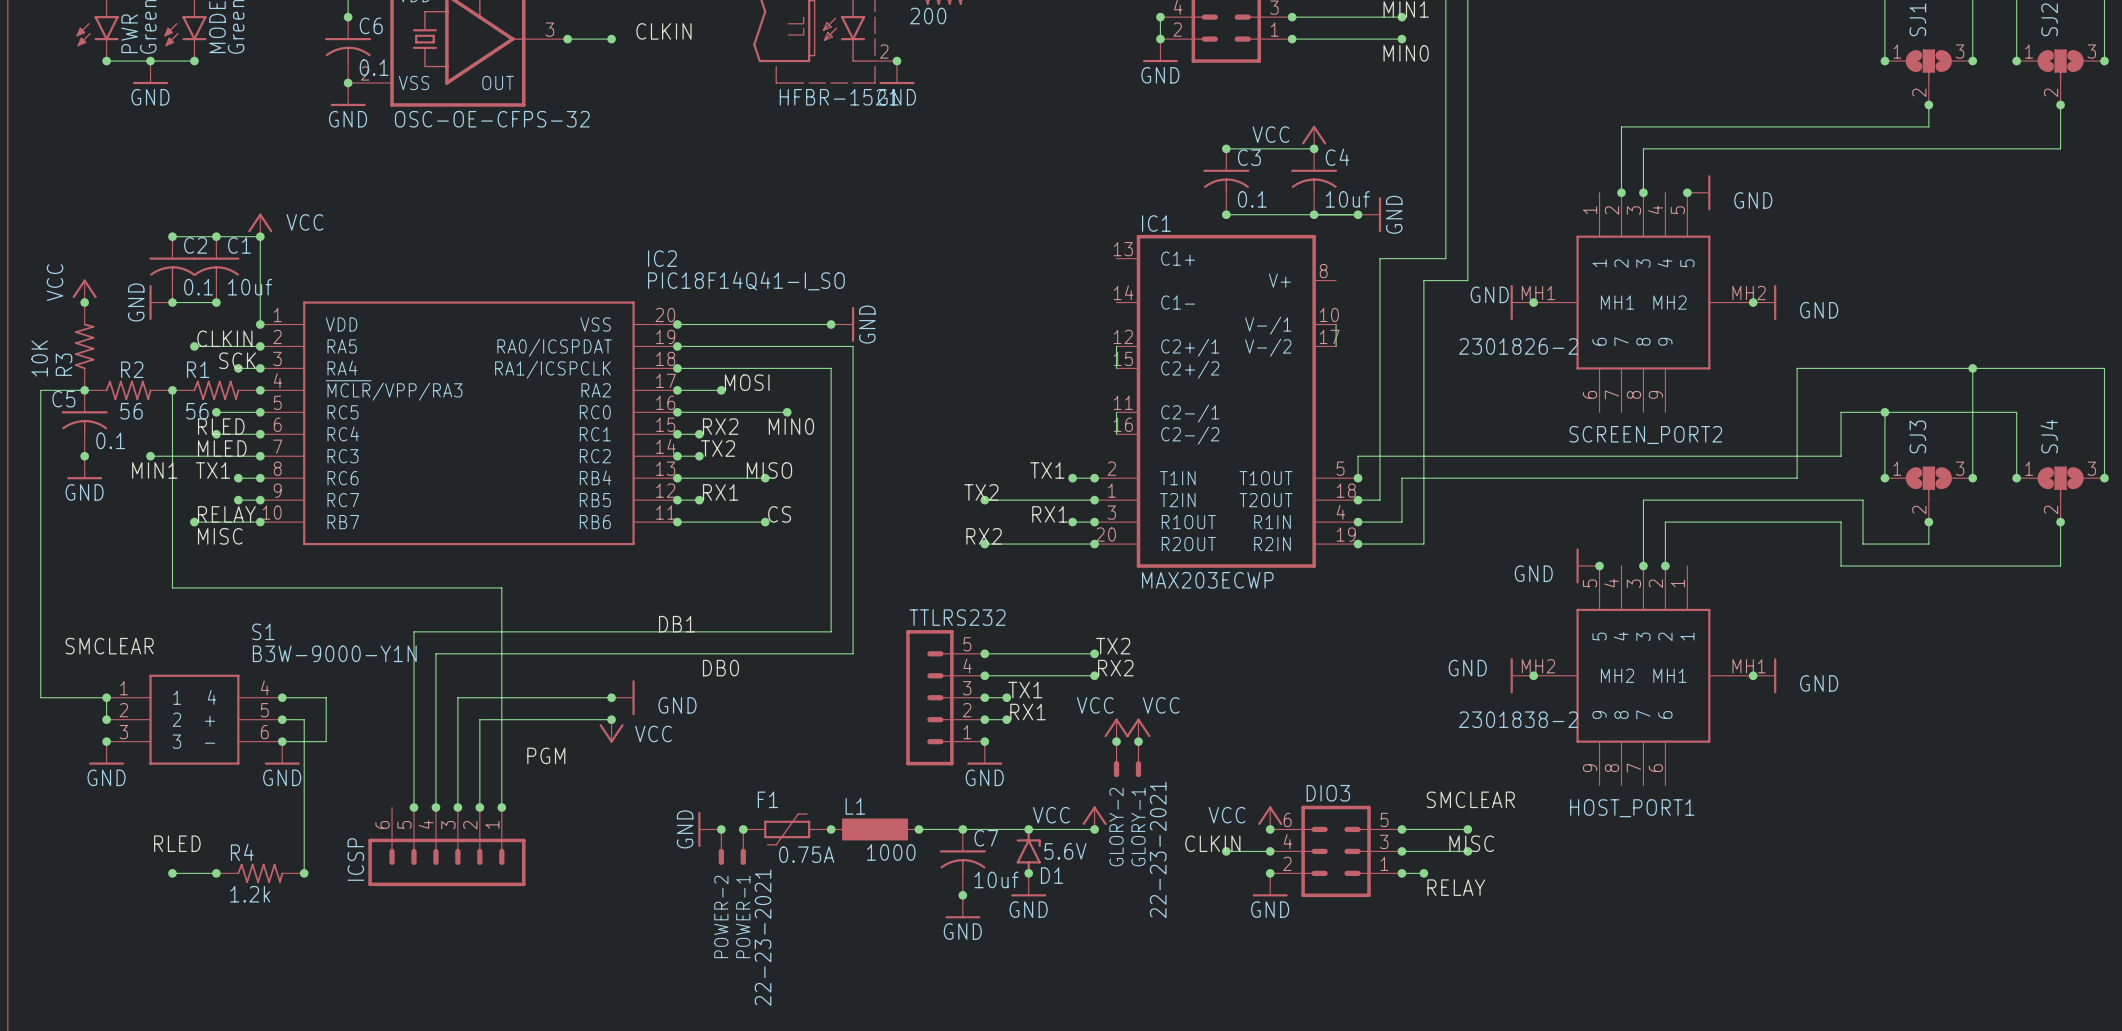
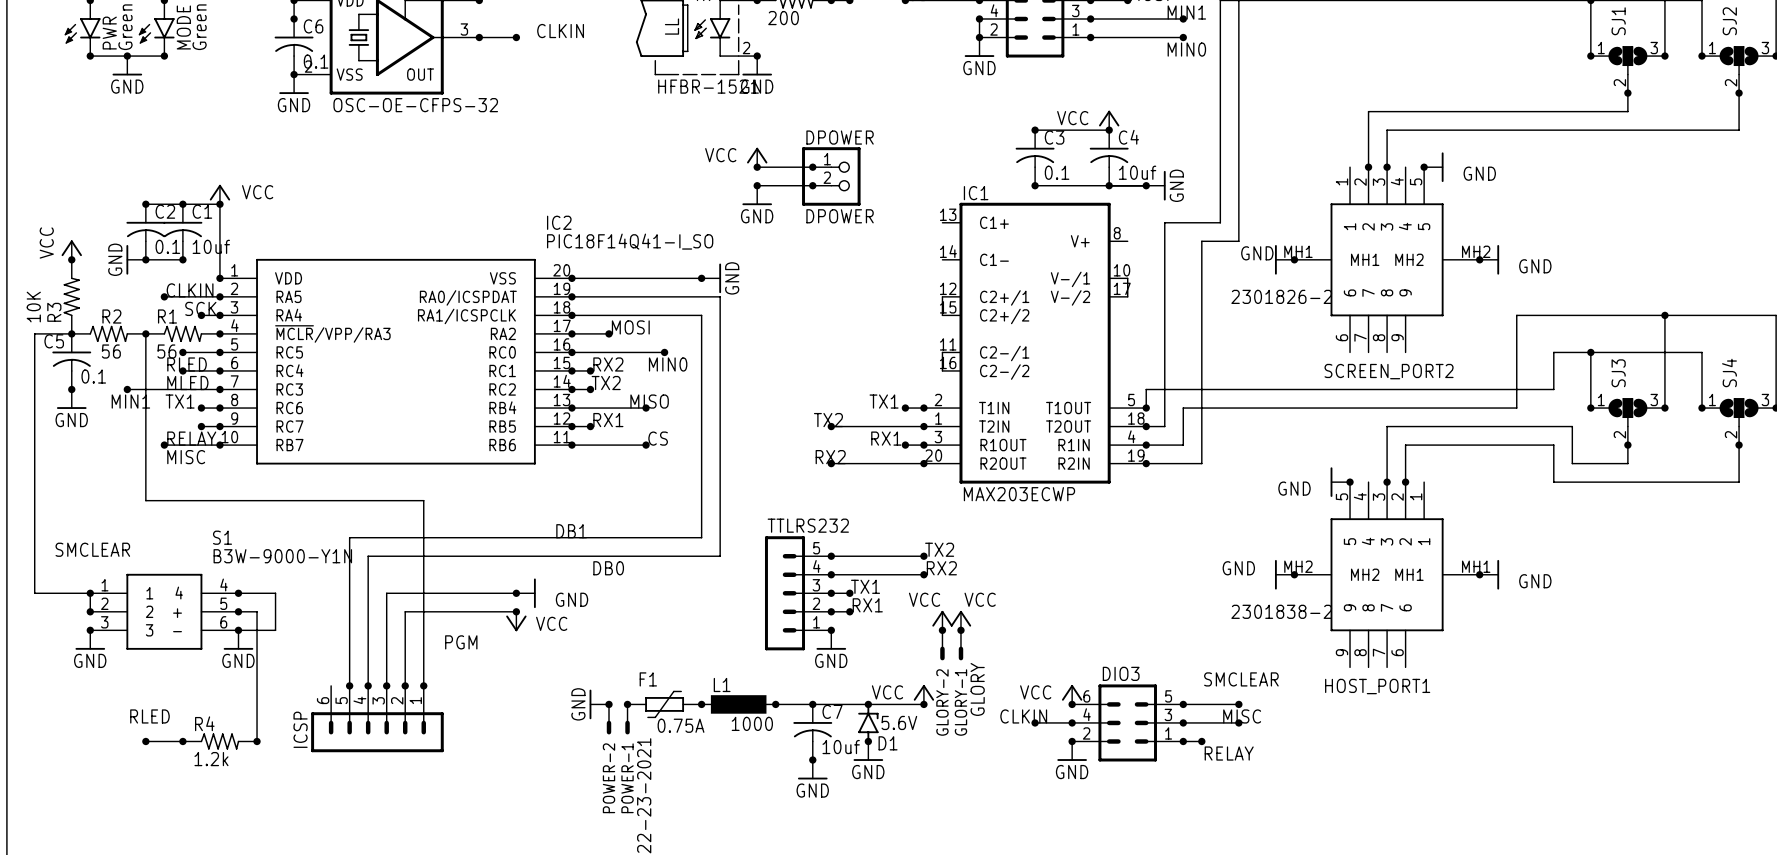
power symbol: none -> VCC (757, 157)
wire: none -> (757, 167) (831, 167)
junction: none -> (757, 167)
junction: none -> (812, 167)
DPOWER: none -> DPOWER (831, 176)
wire: none -> (757, 185) (831, 185)
junction: none -> (757, 185)
junction: none -> (812, 185)
power symbol: none -> GND (757, 195)
GLORY-1 value: 22-23-2021 (1158, 849) -> GLORY (977, 689)

